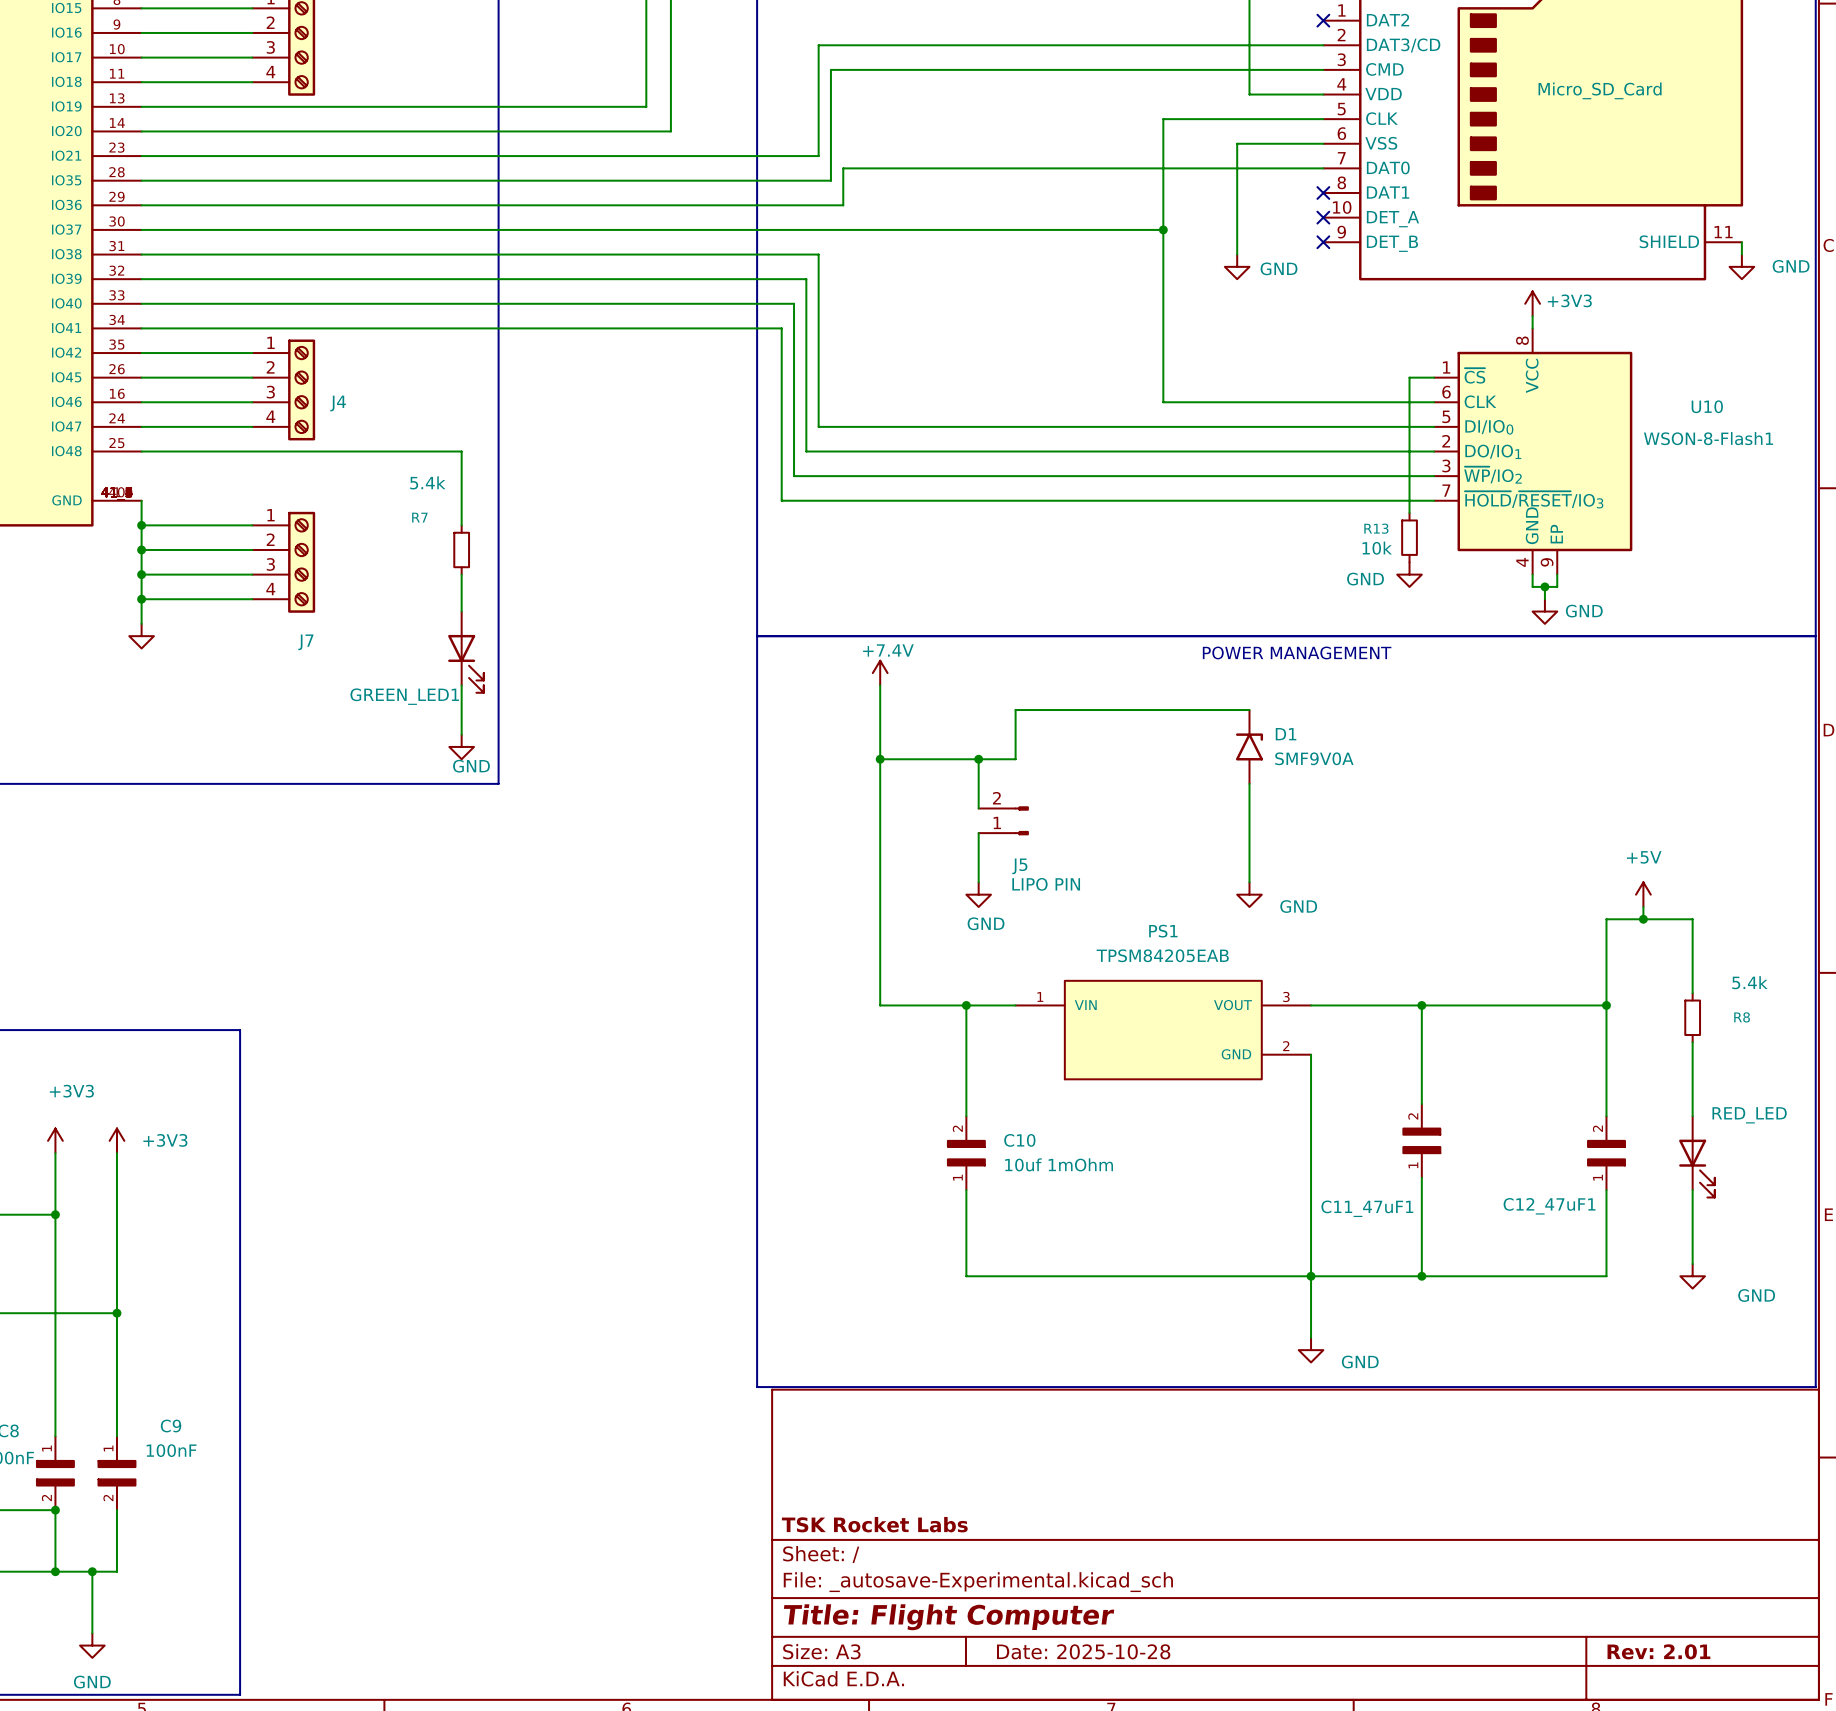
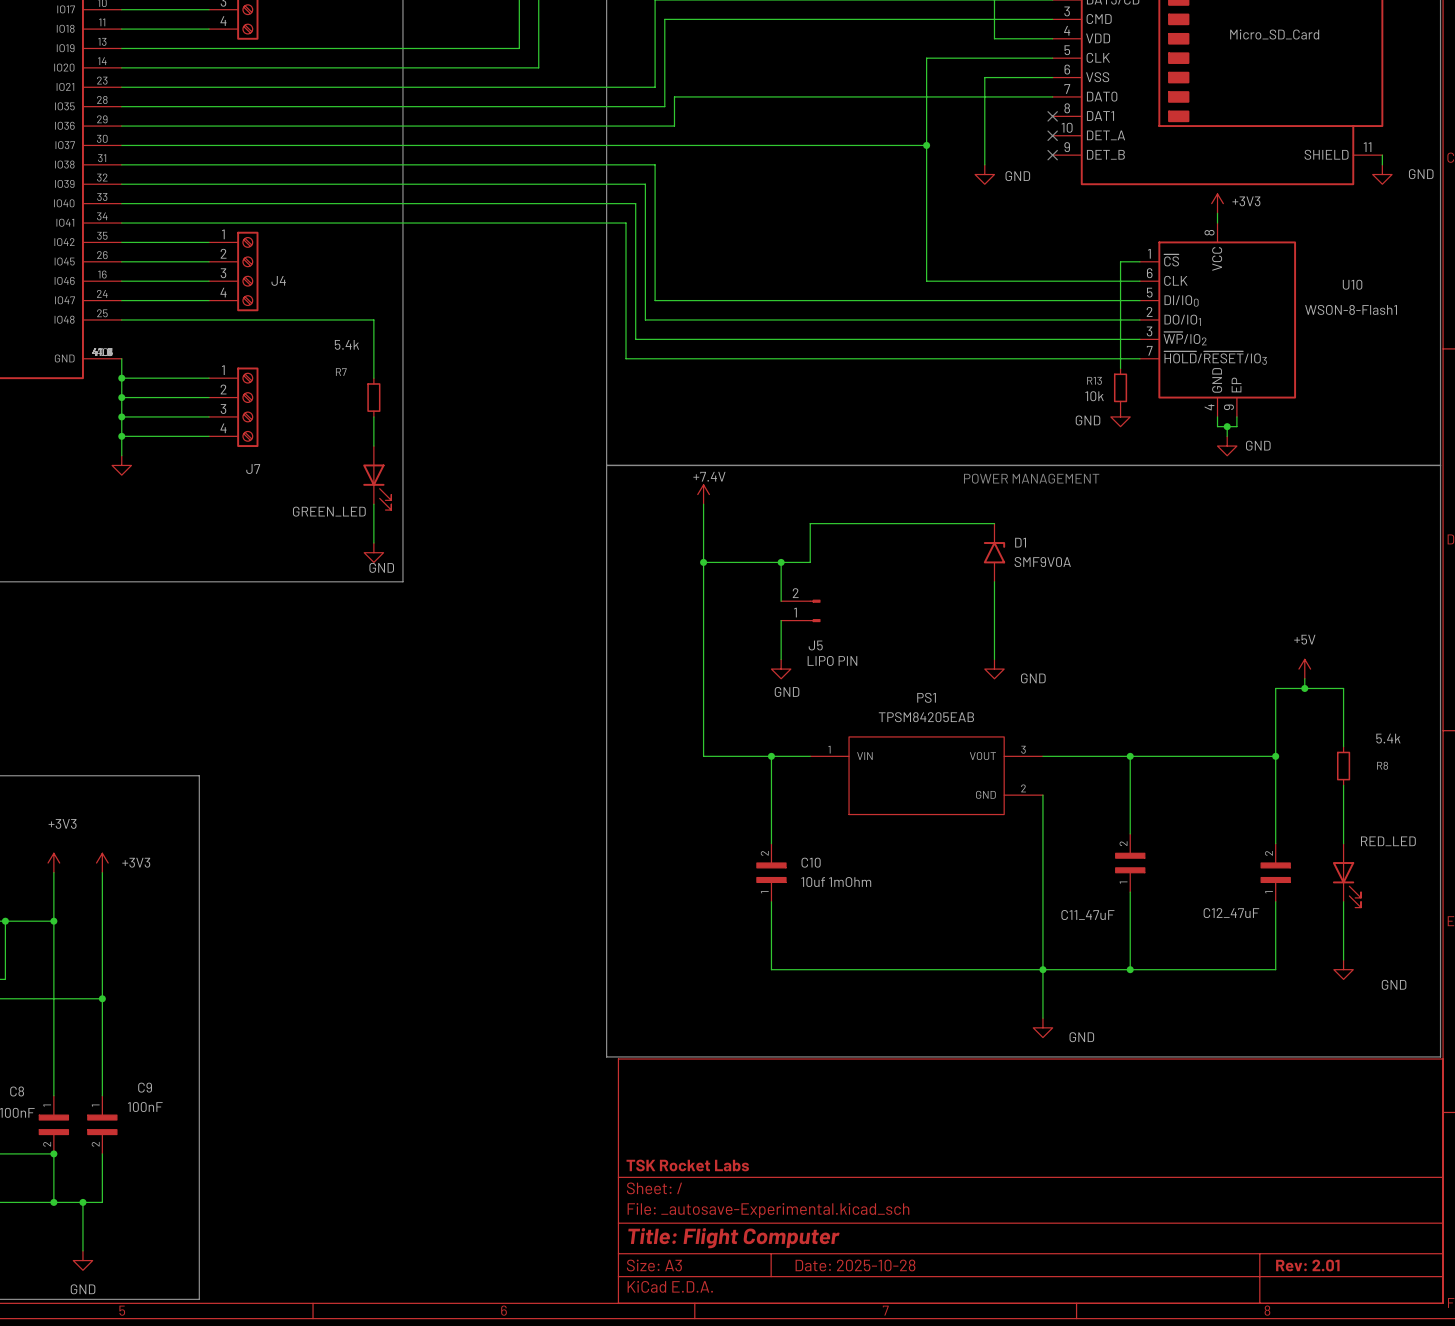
GREEN_LED1 name: GREEN_LED1 (404, 696) -> GREEN_LED (329, 511)
C12_47uF1 name: C12_47uF1 (1549, 1206) -> C12_47uF (1231, 913)
C11_47uF1 name: C11_47uF1 (1367, 1208) -> C11_47uF (1087, 915)

